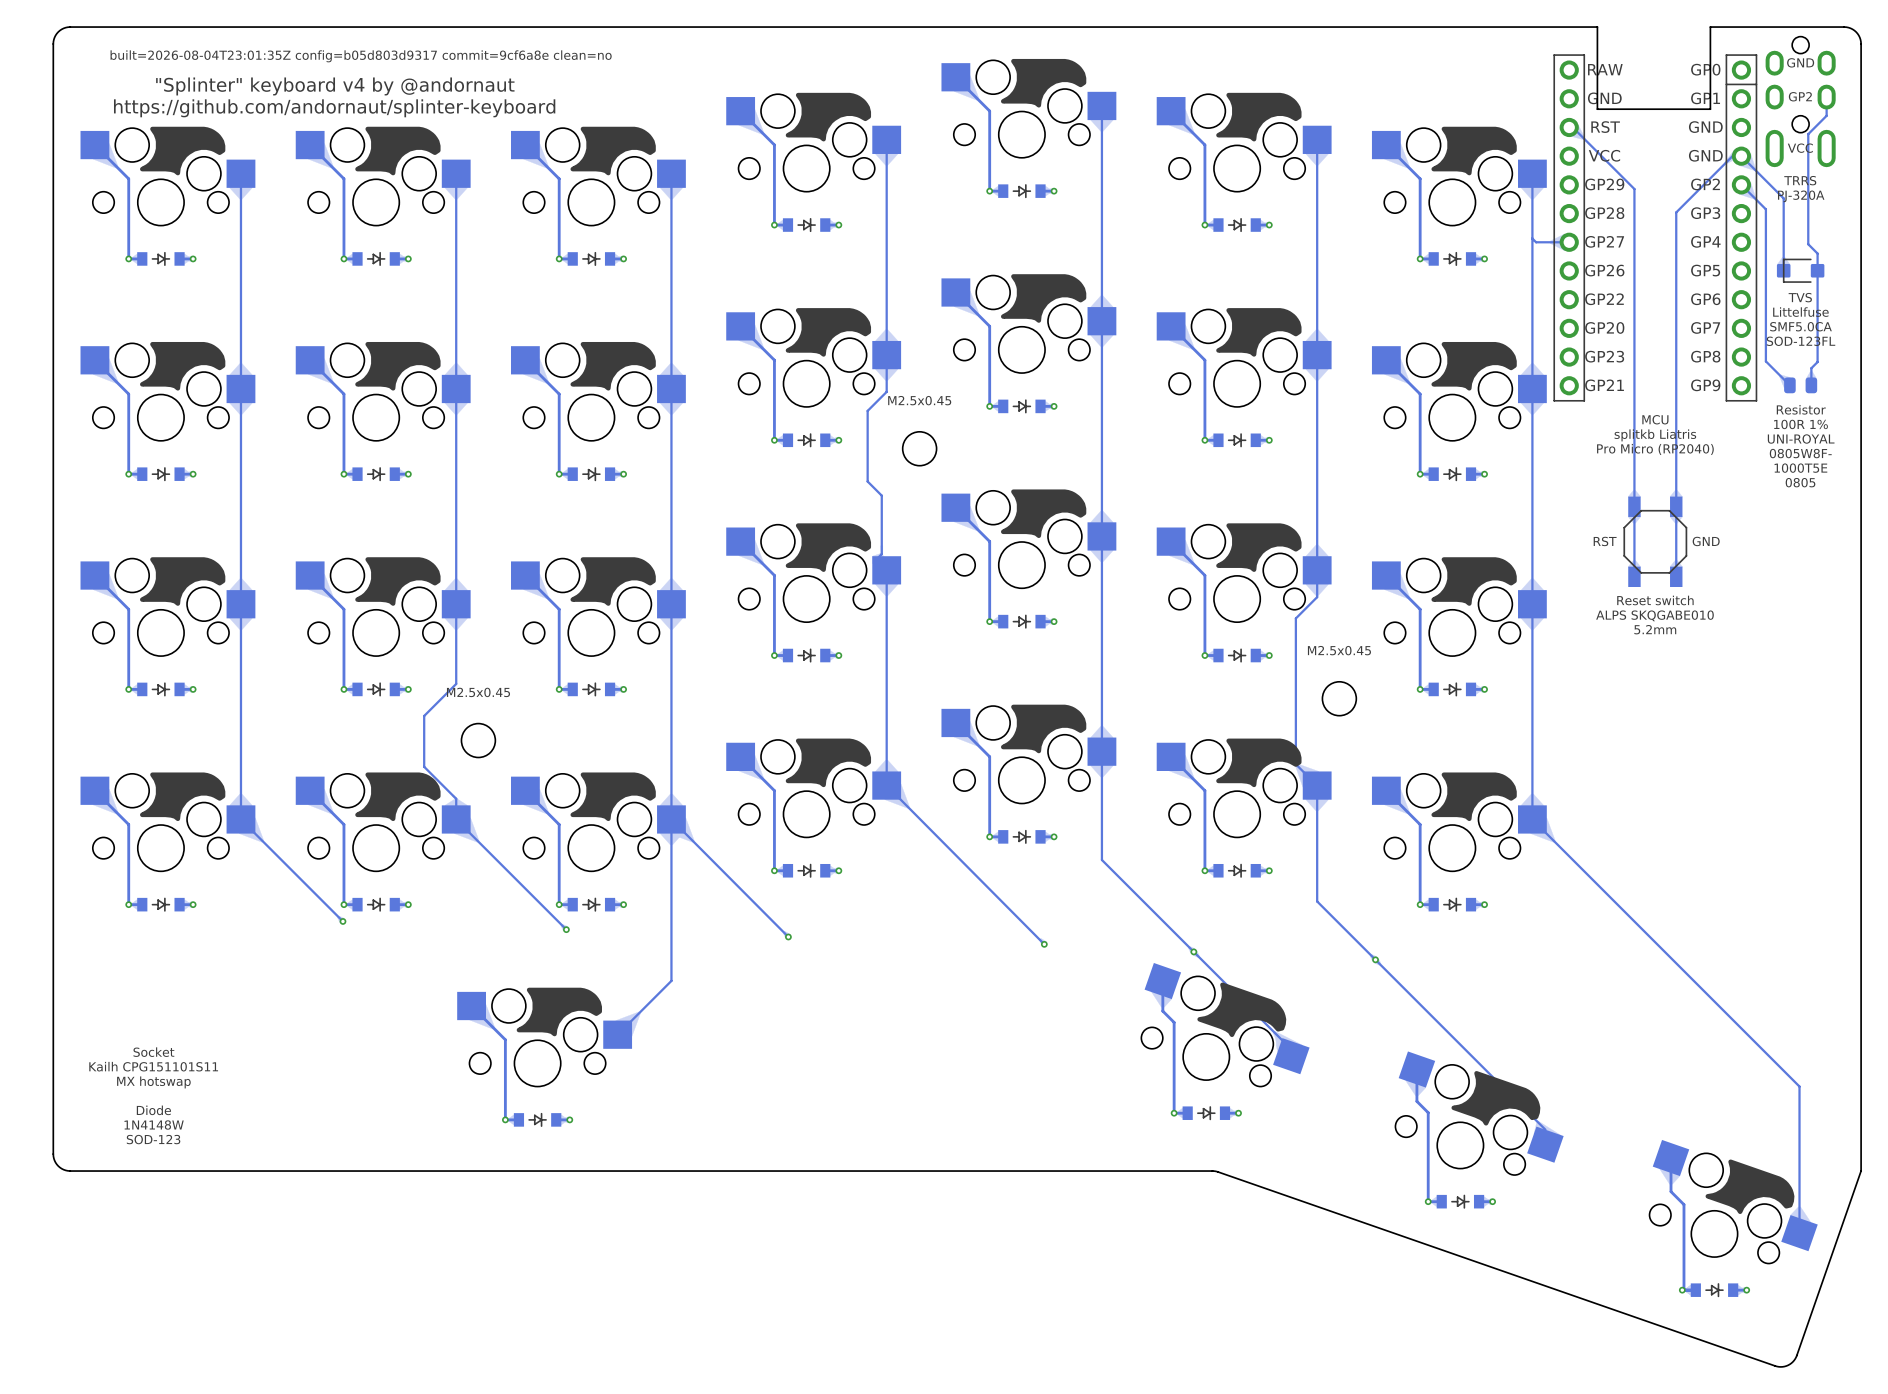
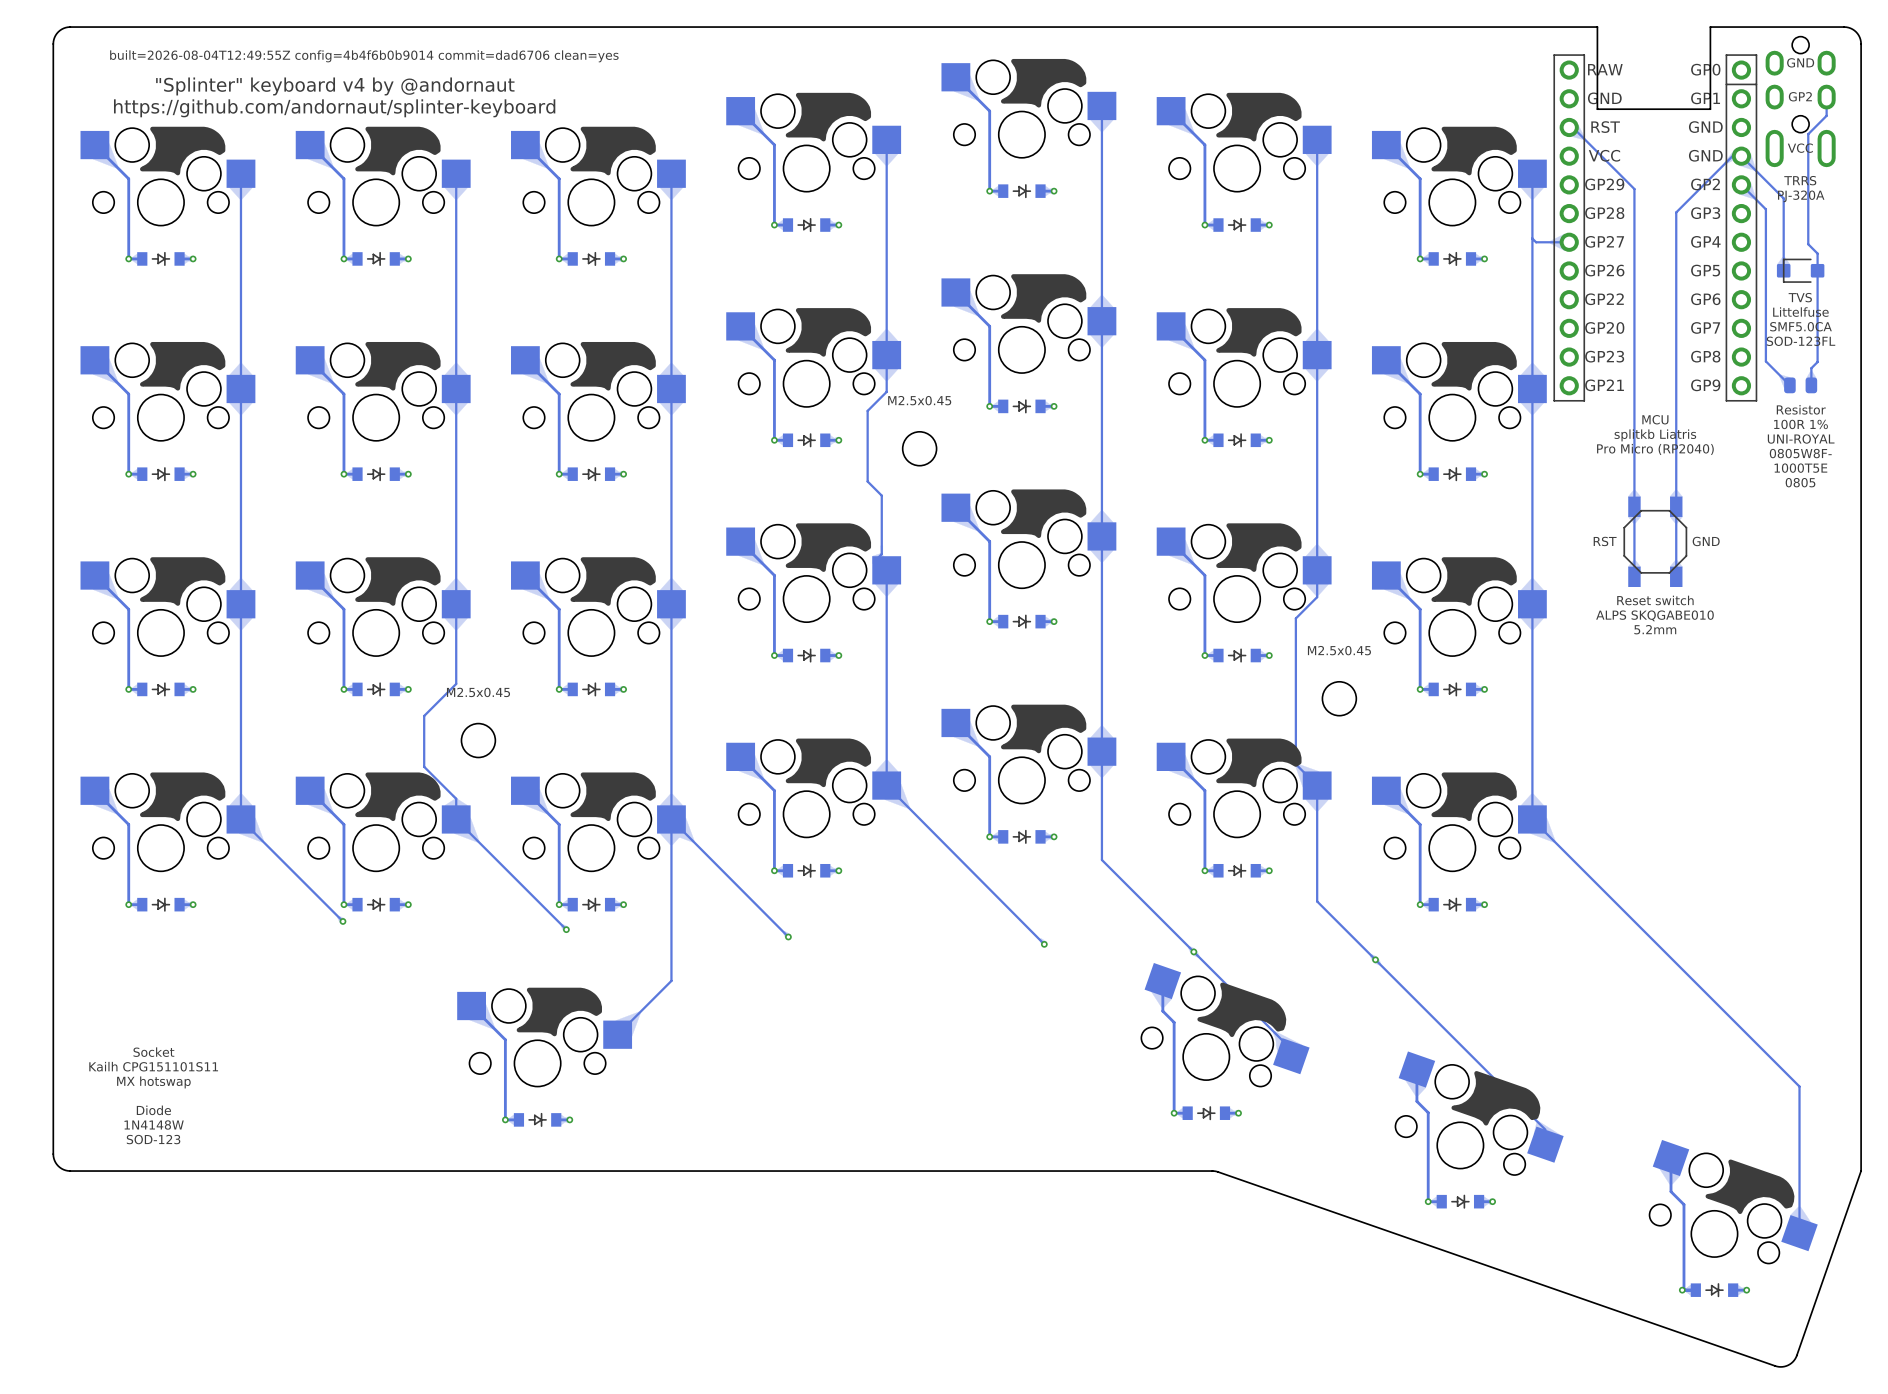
text: built=2026-08-04T23:01:35Z config=b05d803d9317 commit=9cf6a8e clean=no (361, 56) -> built=2026-08-04T12:49:55Z config=4b4f6b0b9014 commit=dad6706 clean=yes (364, 56)

